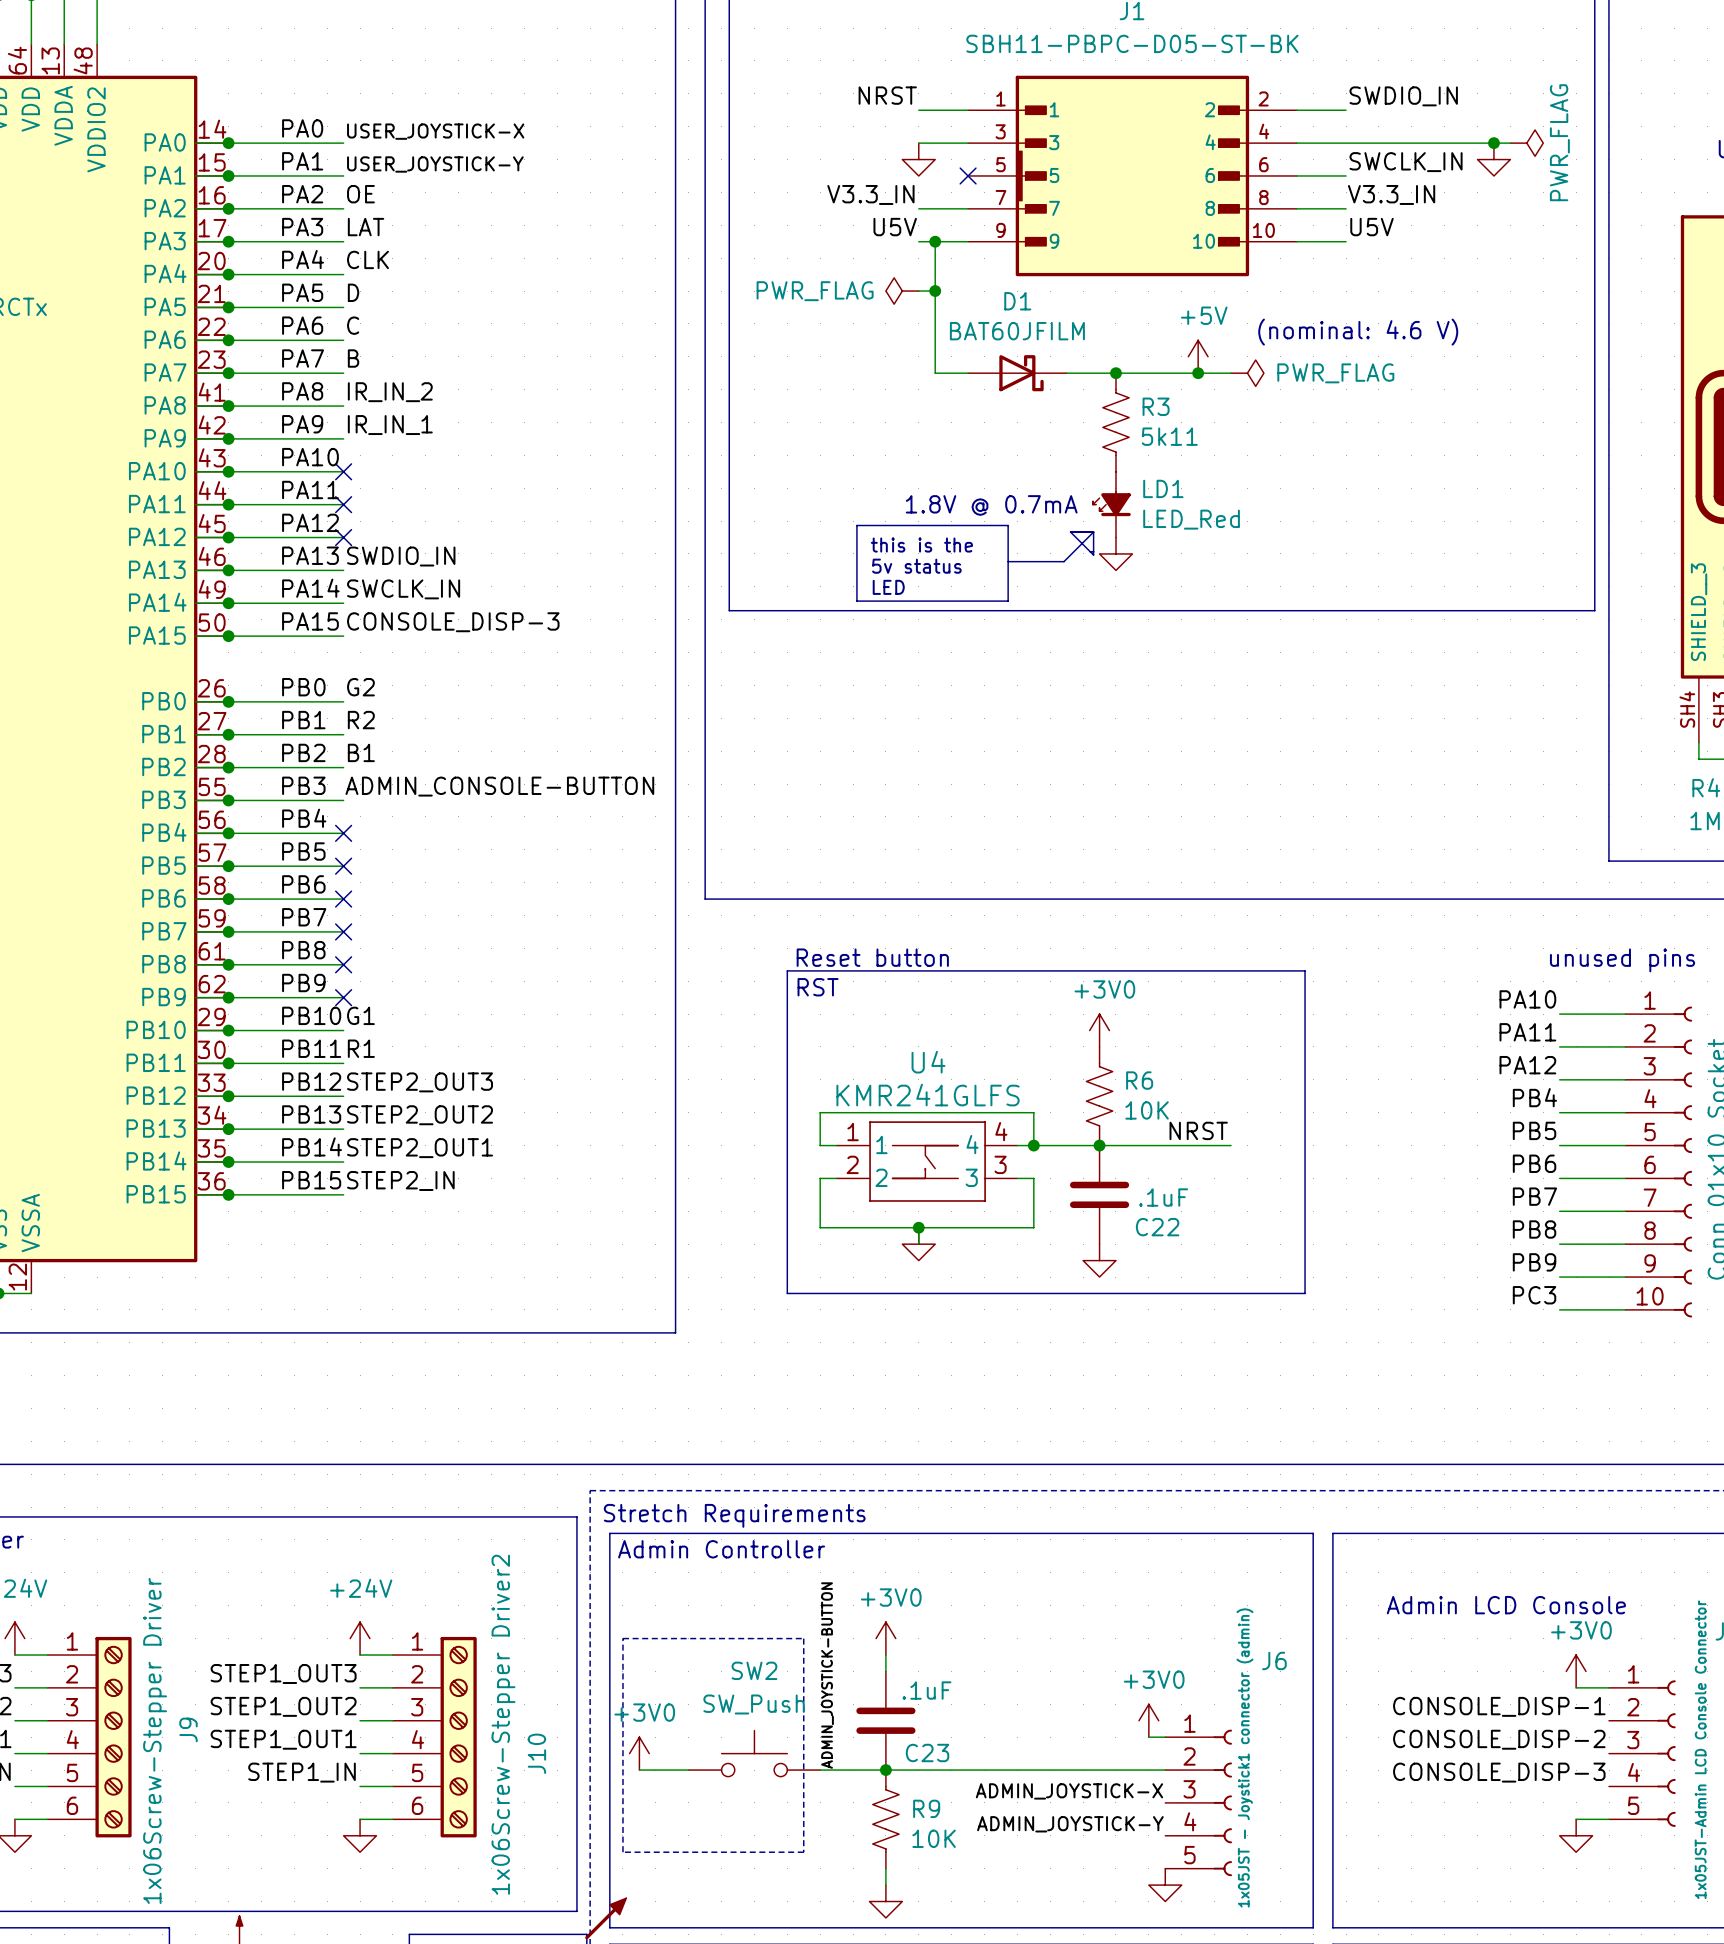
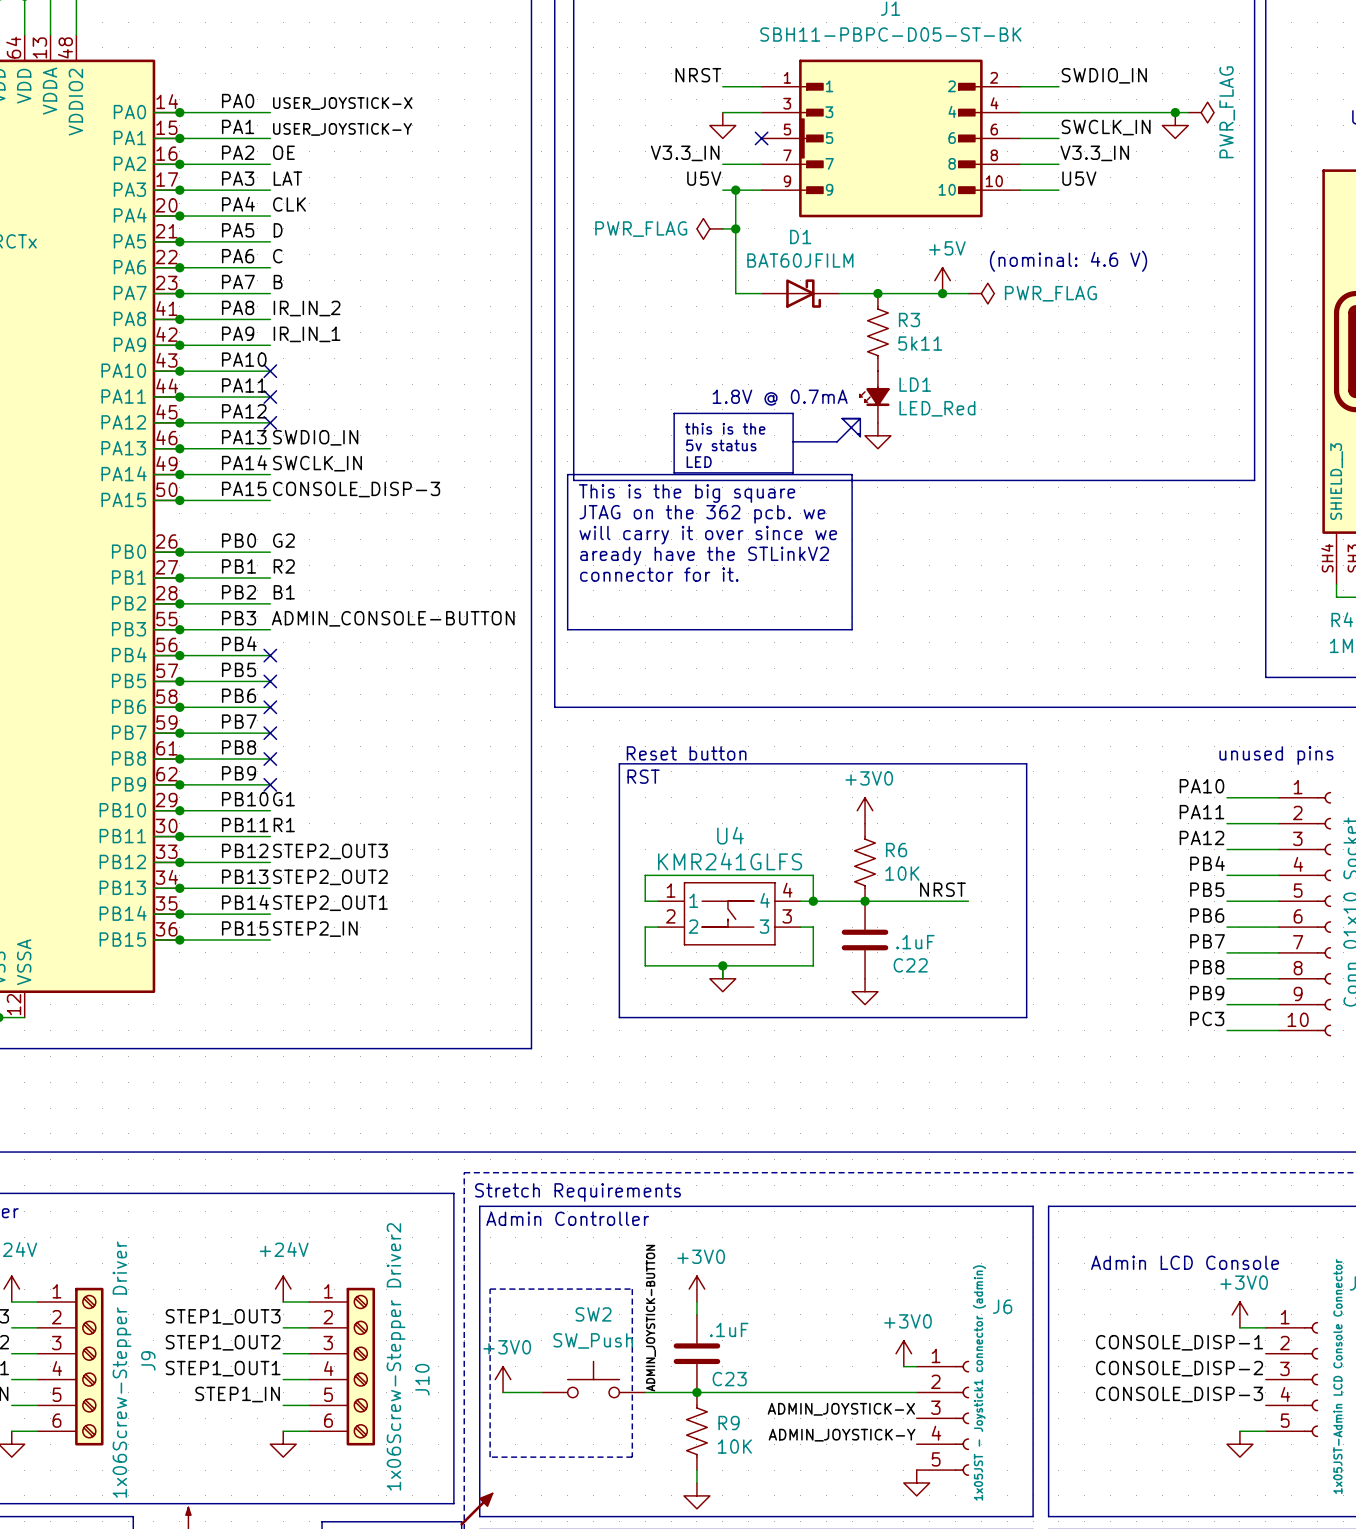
line: none -> (567, 474) (852, 474) (852, 629) (567, 629) (567, 474)
text: none -> This is the big square (687, 493)
text: none -> JTAG on the 362 pcb. we (702, 514)
text: none -> will carry it over since we (708, 535)
text: none -> aready have the STLinkV2 (704, 555)
text: none -> connector for it. (659, 574)

